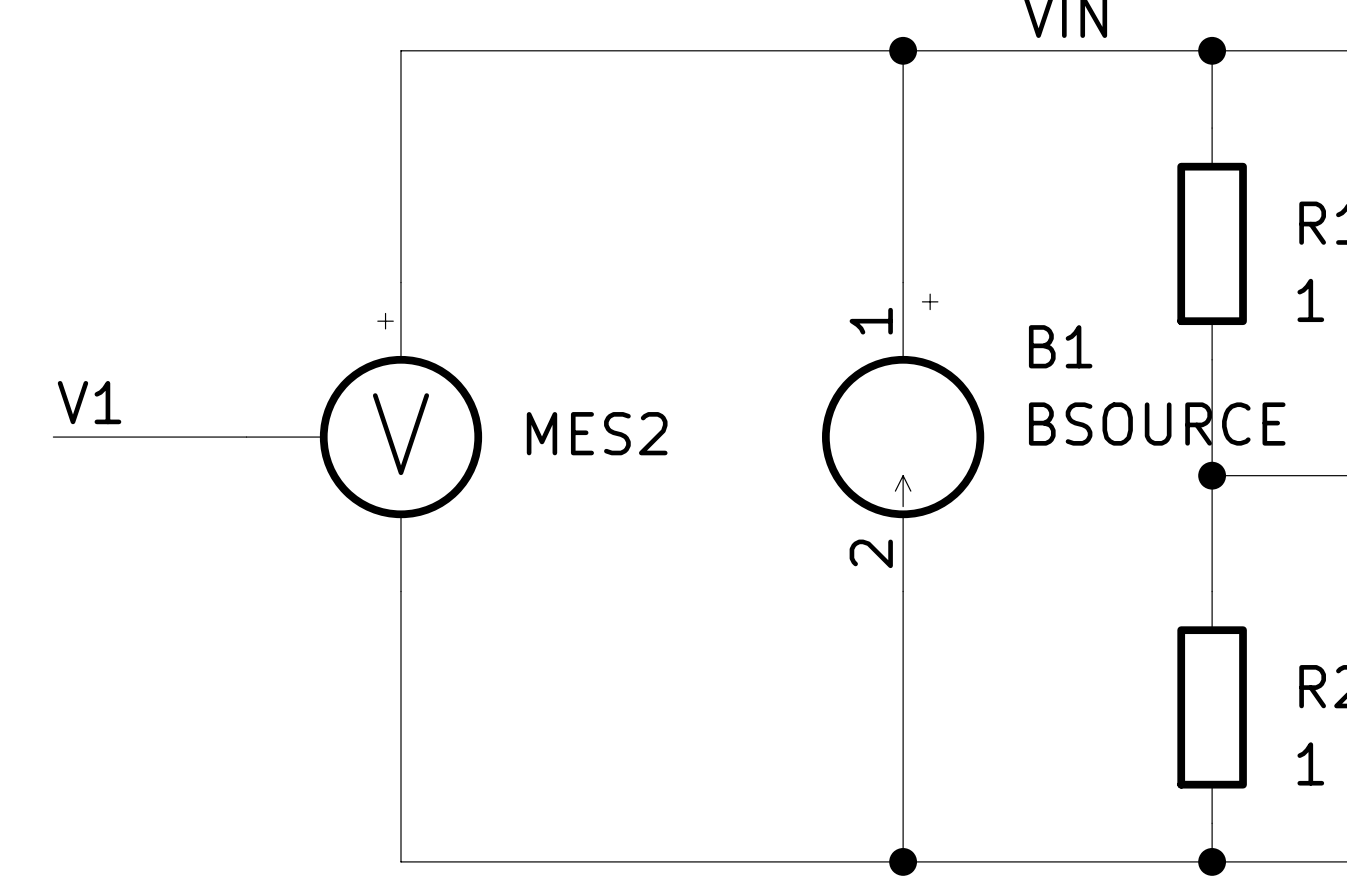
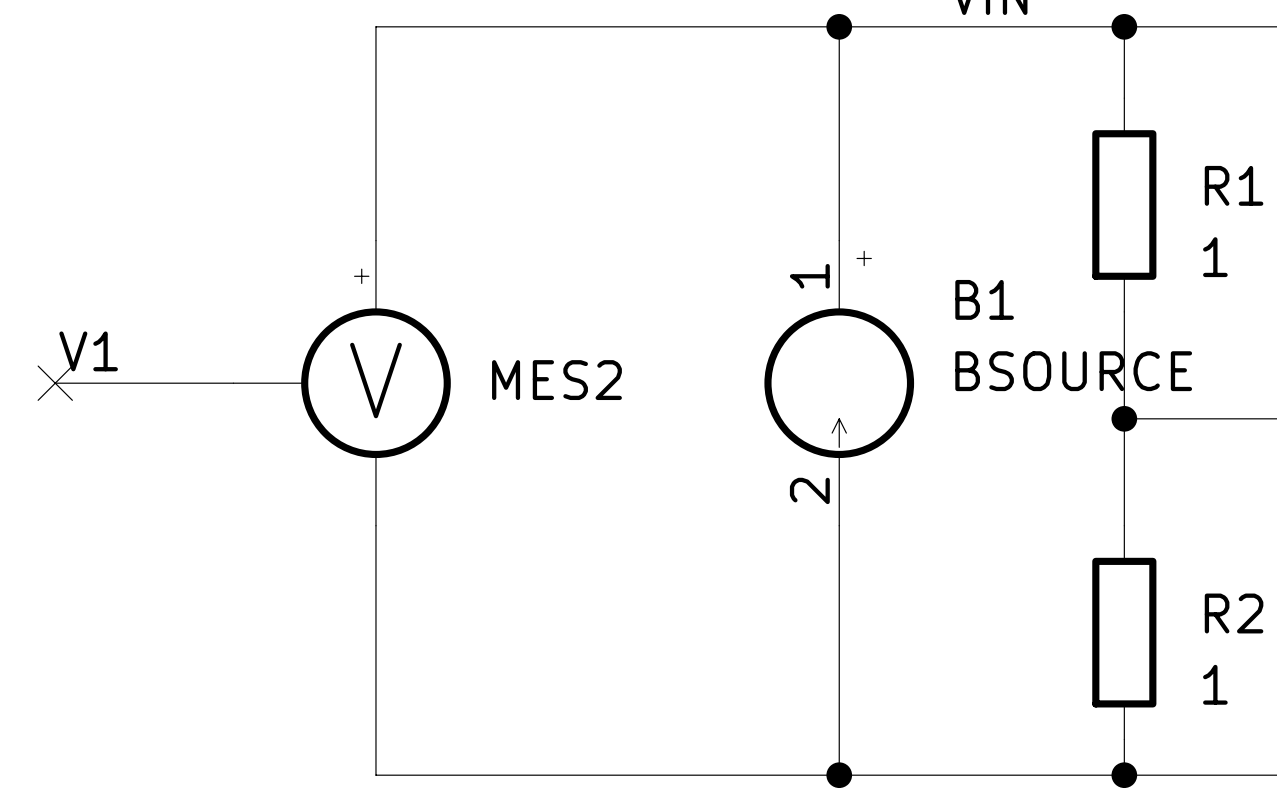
no-connect mark: none -> (55, 383)

